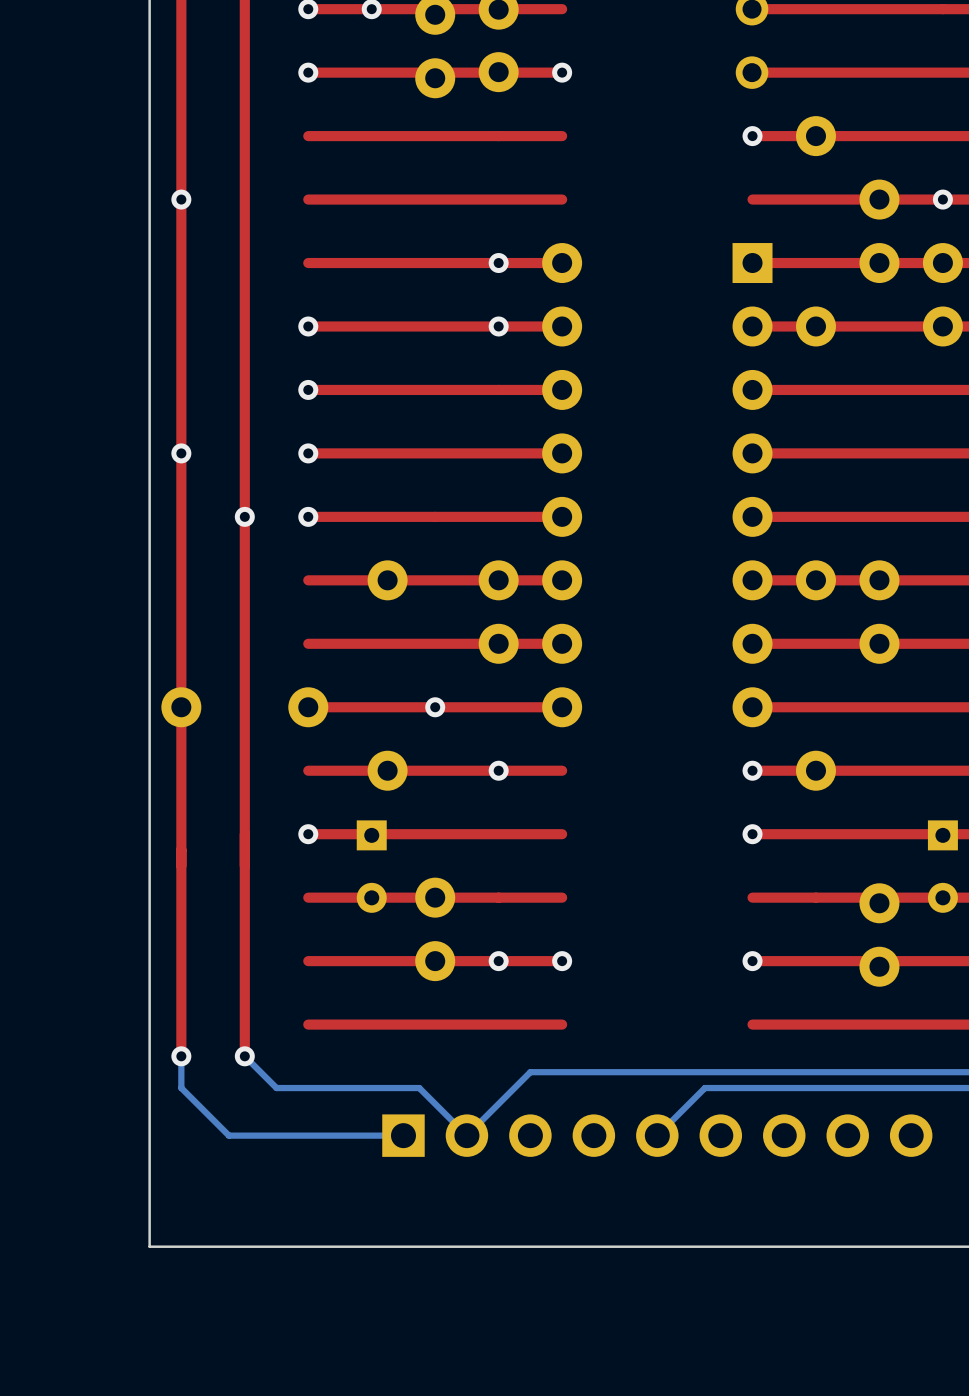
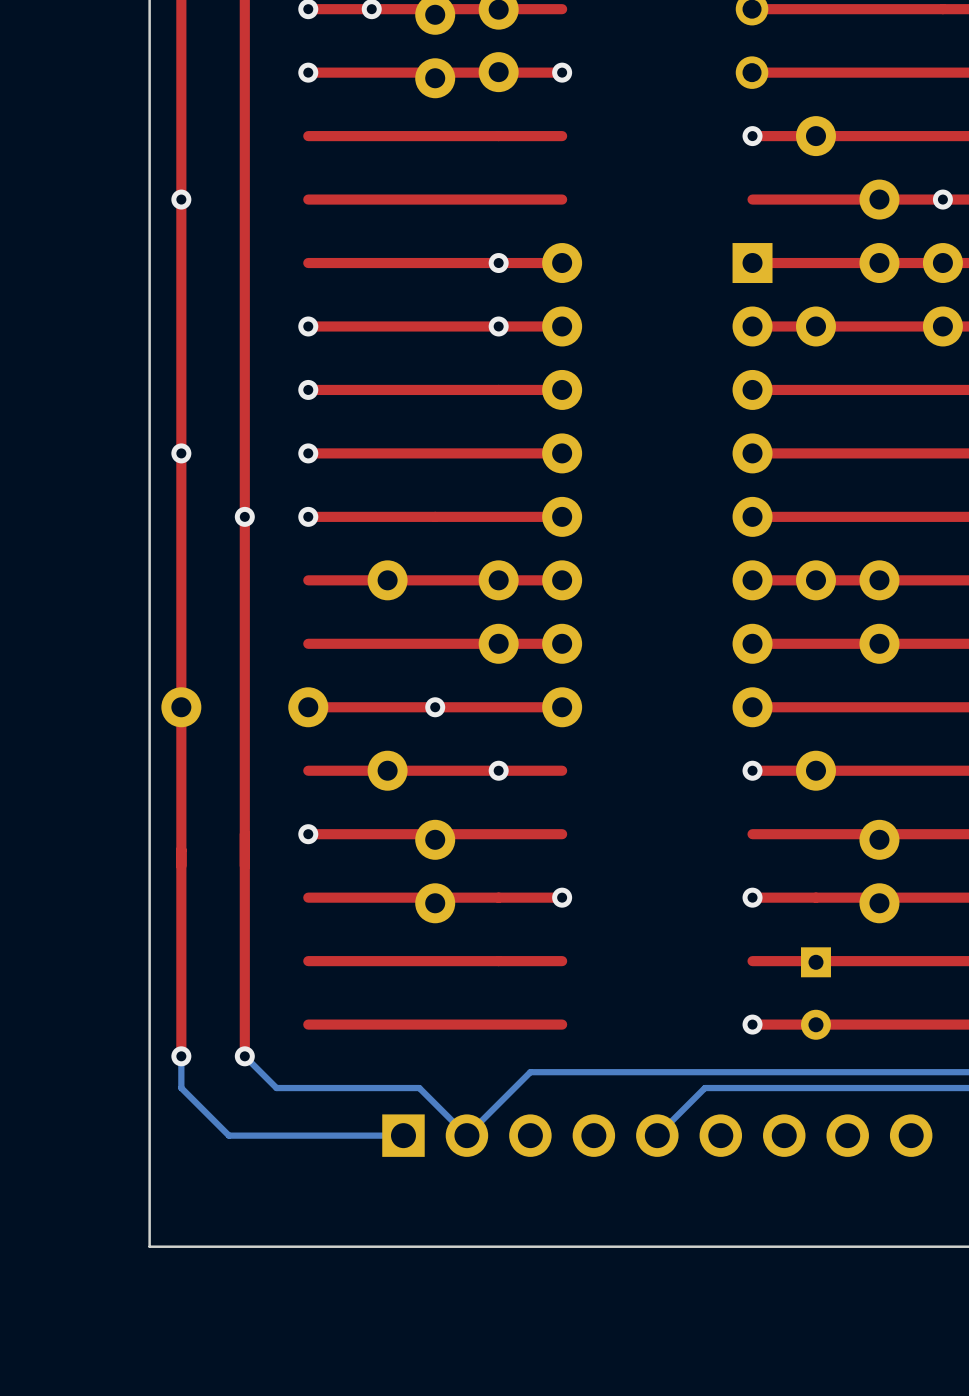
via: (752, 834) -> none
part: (371, 866) -> none
part position: (942, 866) -> (815, 993)
via: none -> (562, 897)
via: none -> (752, 897)
part position: (435, 929) -> (435, 871)
part position: (879, 935) -> (879, 871)
via: (498, 961) -> none
via: (562, 961) -> none
via: (752, 961) -> none
via: none -> (752, 1024)

